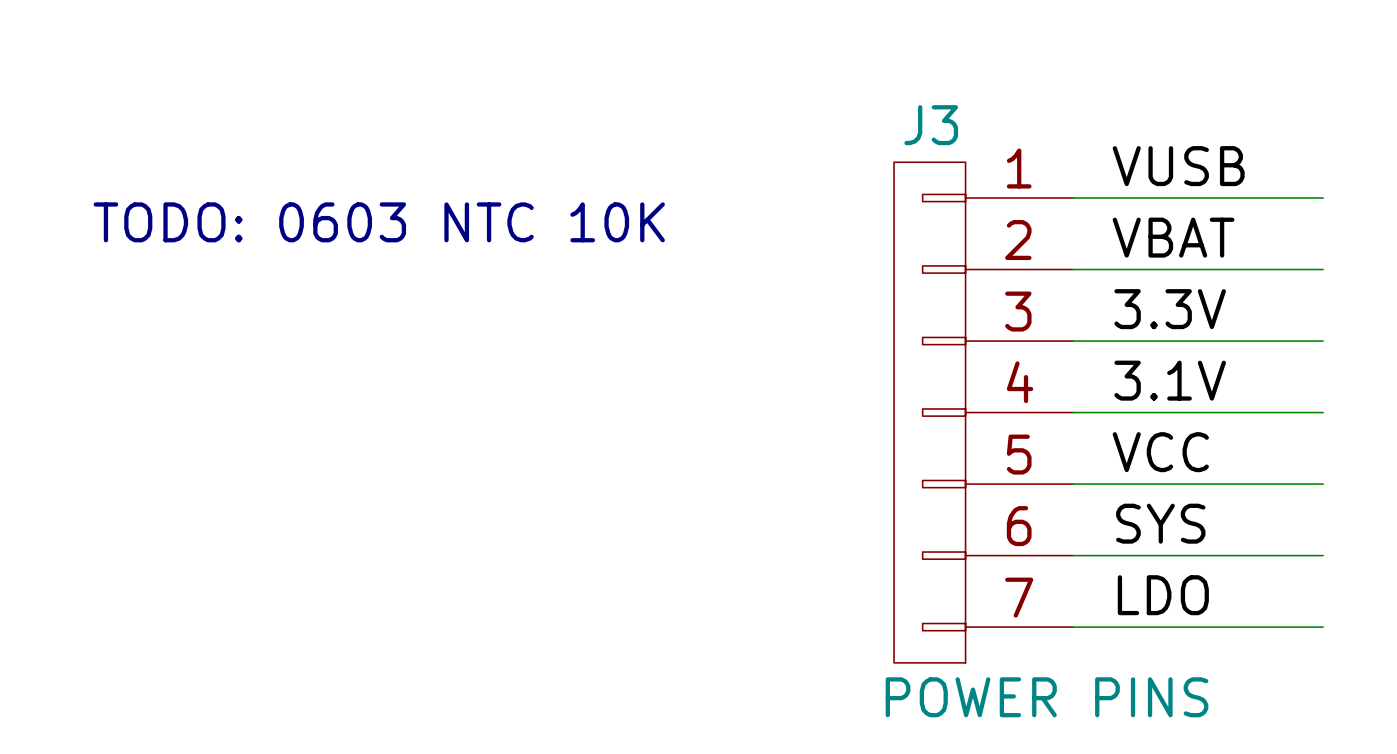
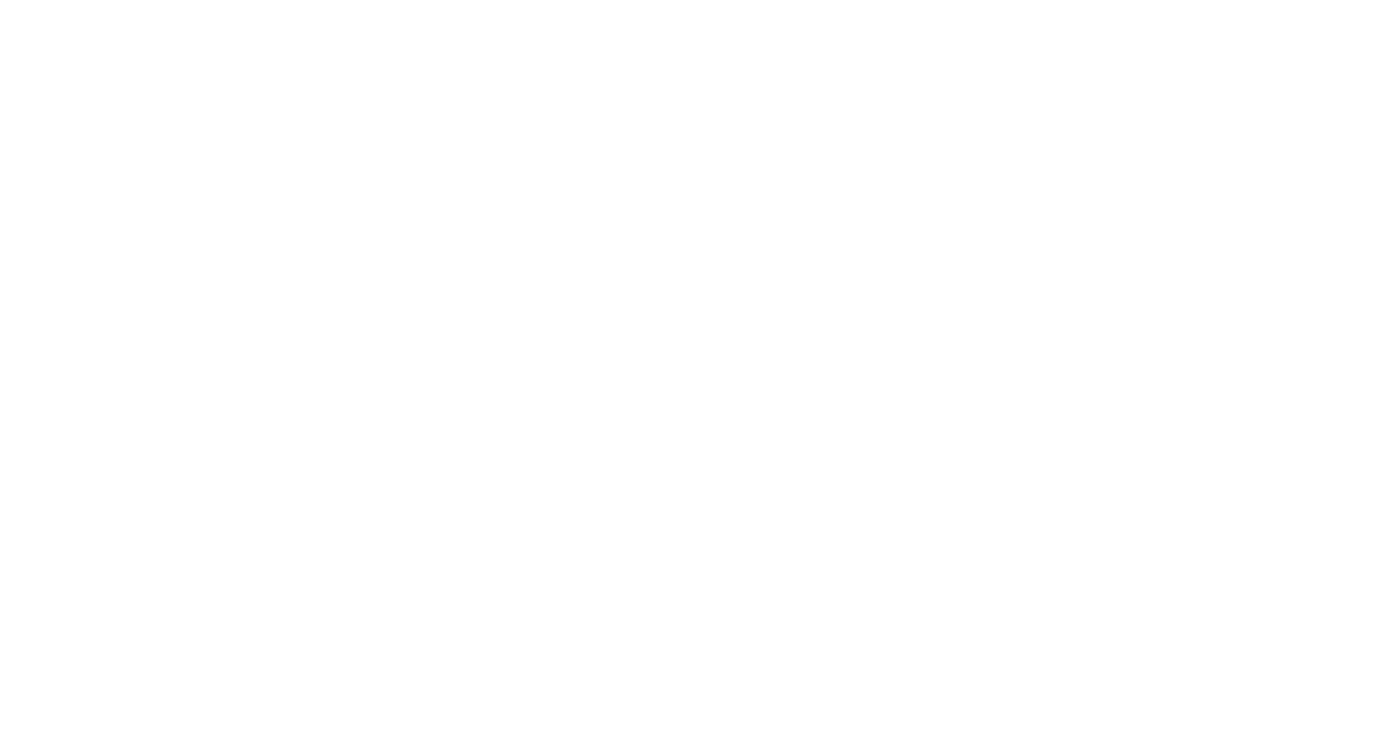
label: VUSB (1178, 166) -> none
wire: (1072, 198) (1323, 198) -> none
text: TODO: 0603 NTC 10K (379, 222) -> none
label: VBAT (1173, 237) -> none
wire: (1072, 269) (1323, 269) -> none
label: 3.3V (1170, 309) -> none
wire: (1072, 341) (1323, 341) -> none
label: 3.1V (1170, 380) -> none
J3: POWER PINS (983, 412) -> none
wire: (1072, 412) (1323, 412) -> none
label: VCC (1160, 452) -> none
wire: (1072, 484) (1323, 484) -> none
label: SYS (1160, 523) -> none
wire: (1072, 555) (1323, 555) -> none
label: LDO (1163, 595) -> none
wire: (1072, 627) (1323, 627) -> none

